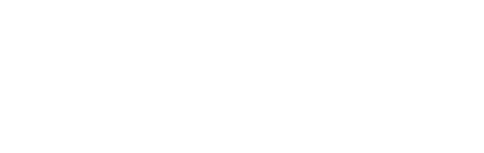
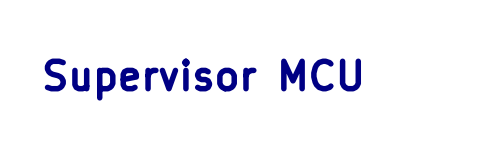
text: none -> Supervisor MCU (202, 79)

